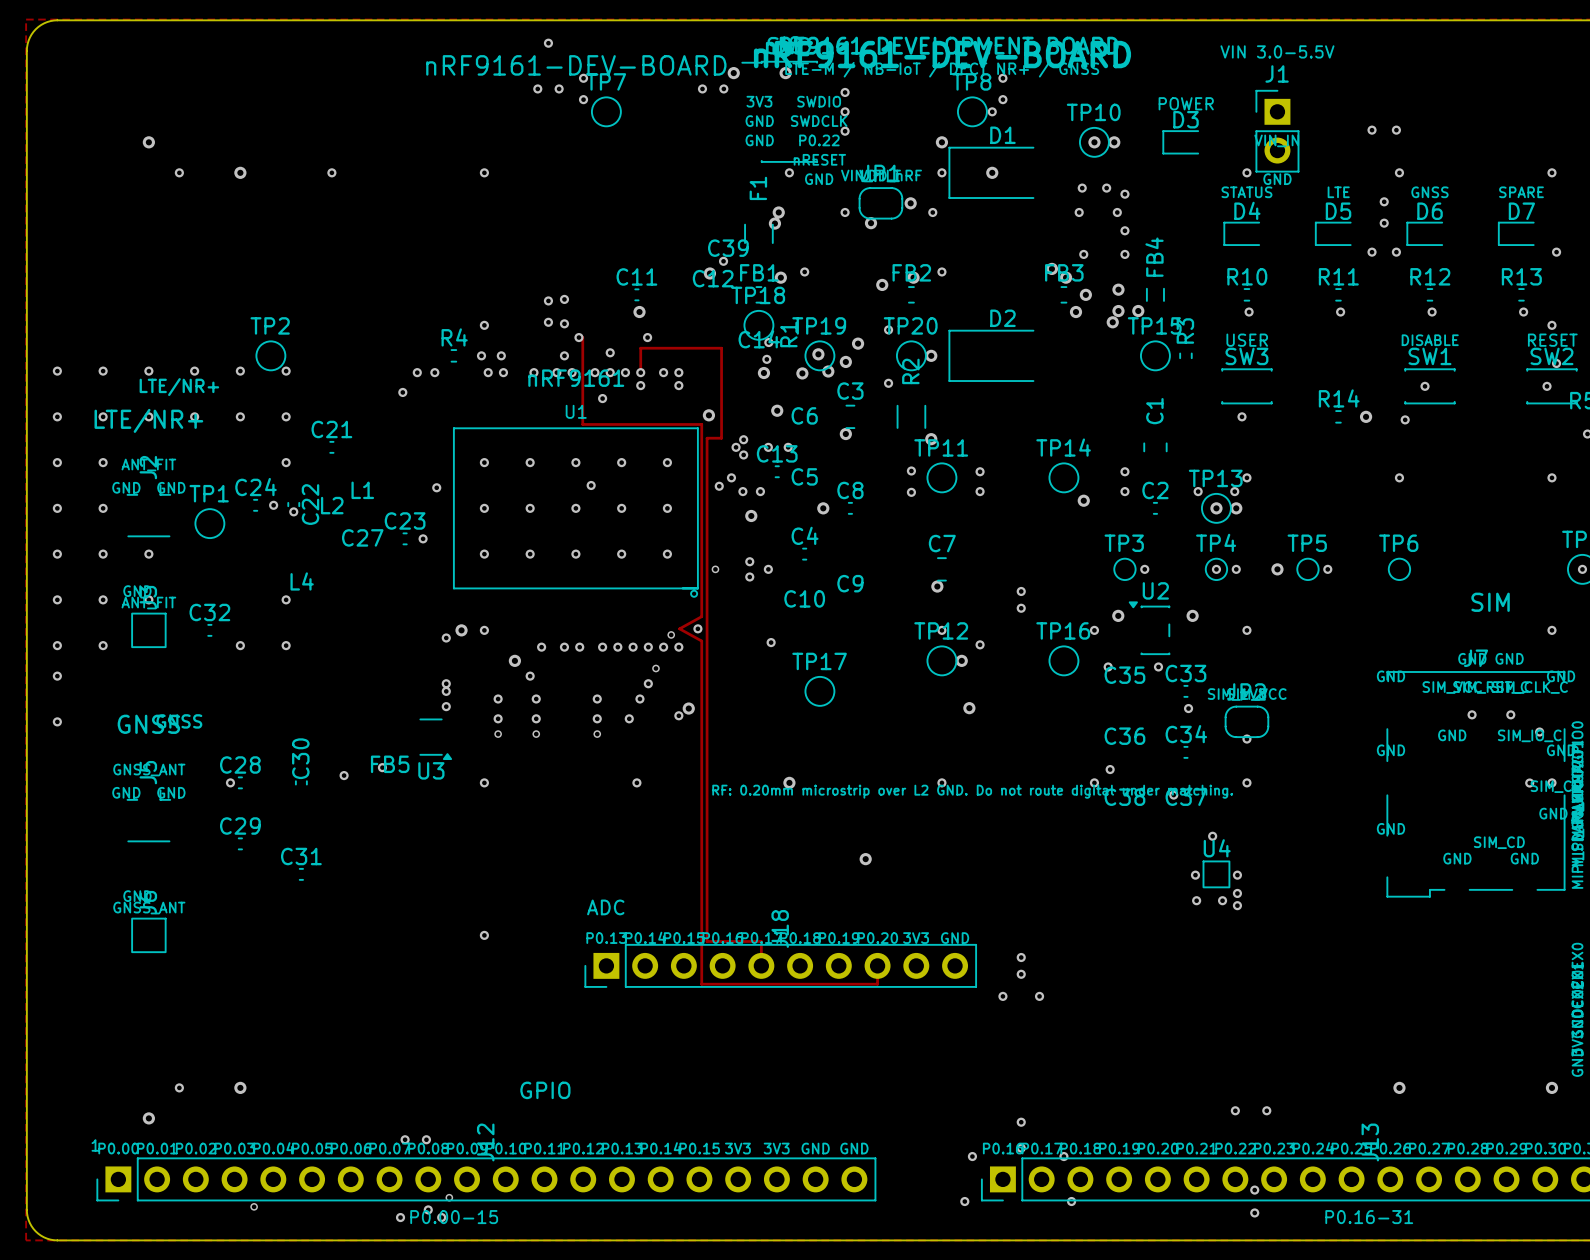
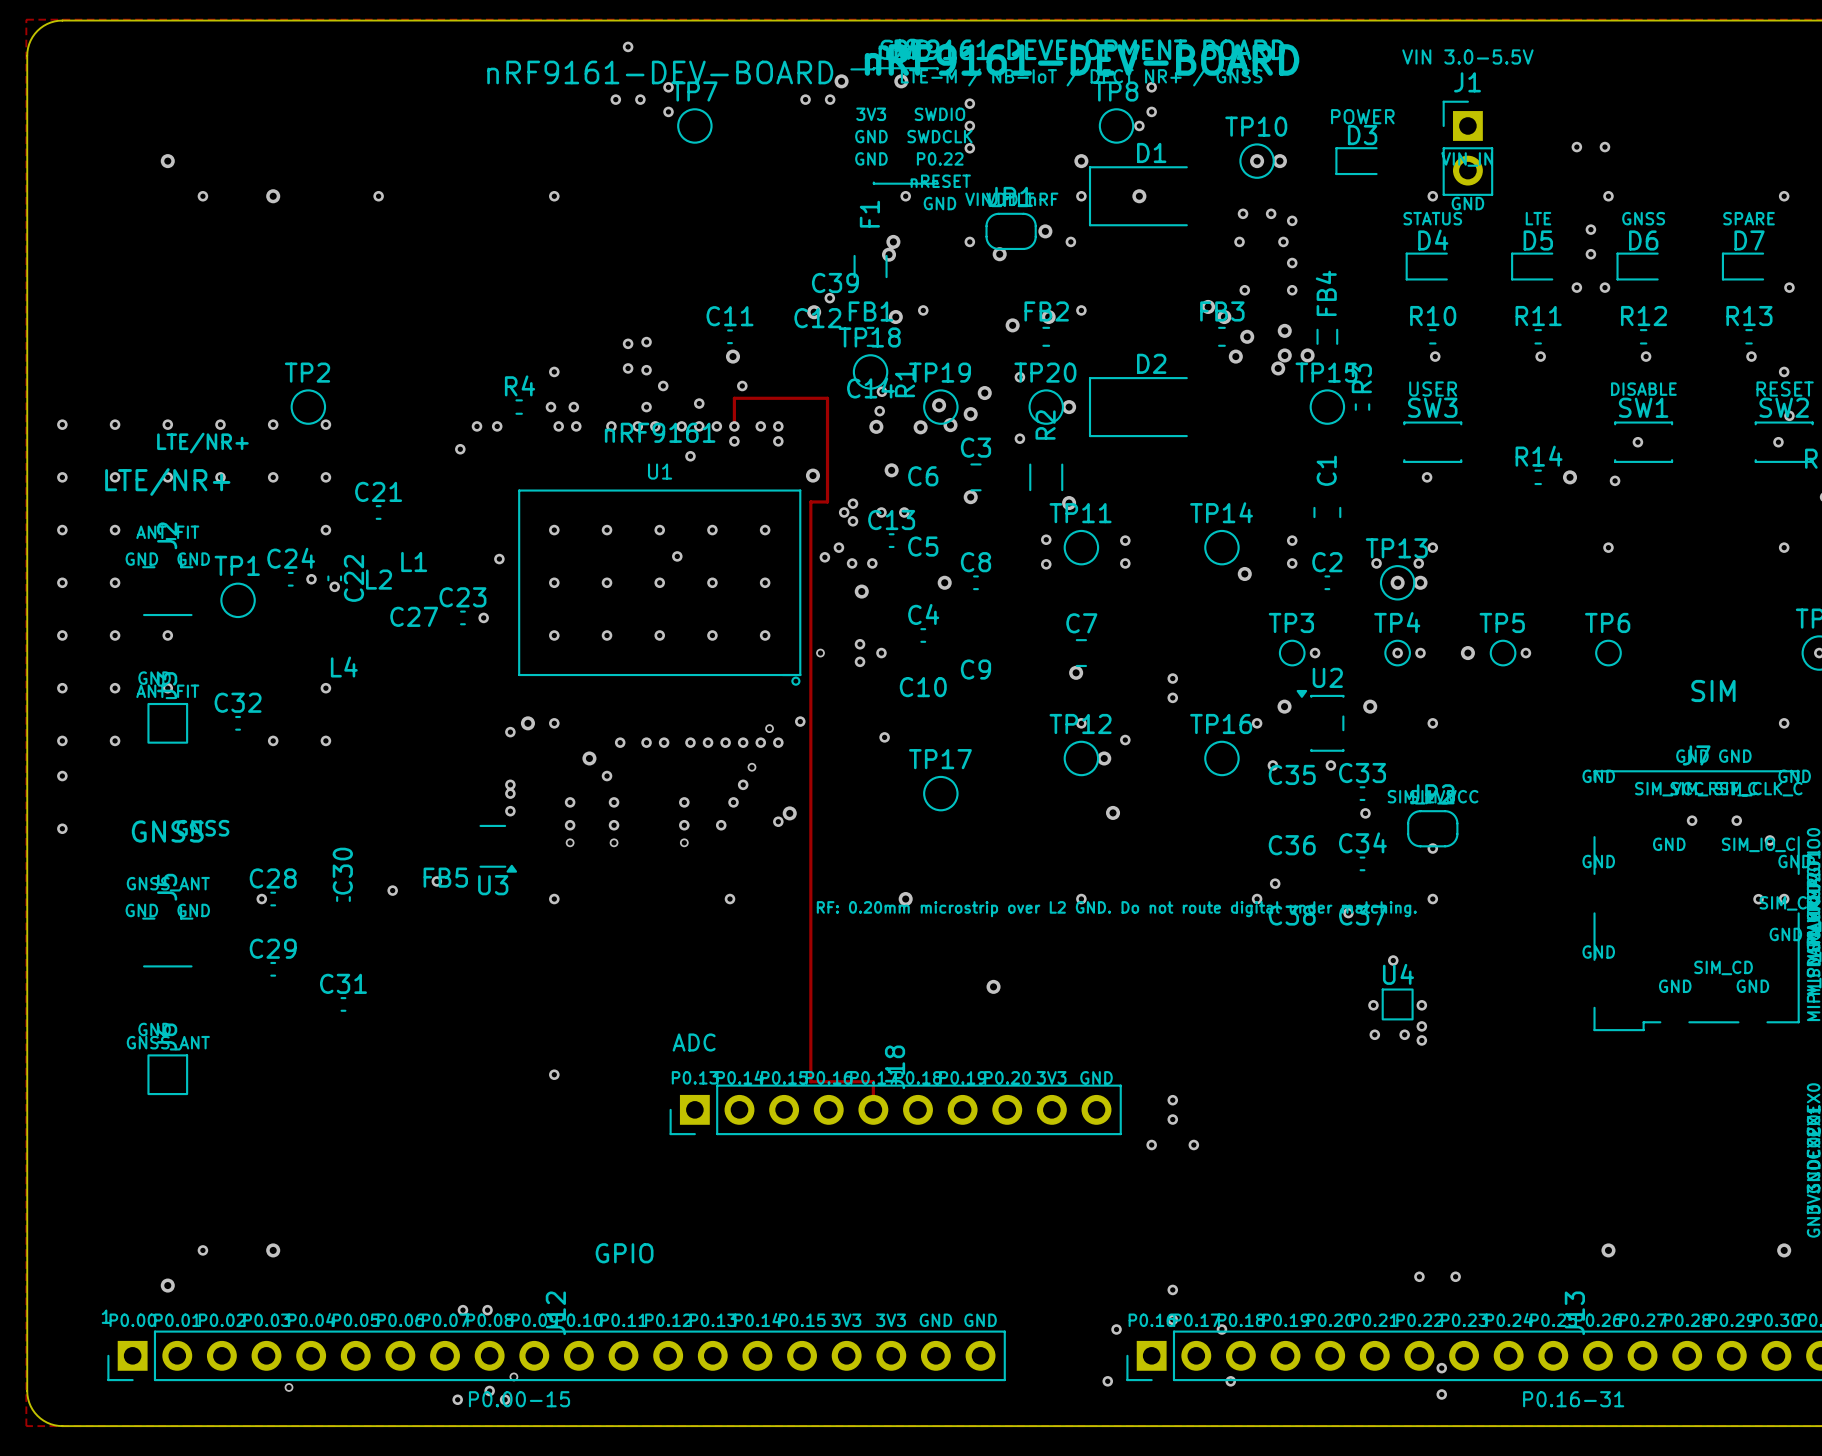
track: (578, 337) (582, 337) (582, 424) (701, 424) (701, 616) (679, 628) (701, 641) (701, 984) (877, 984) (877, 965) -> none

